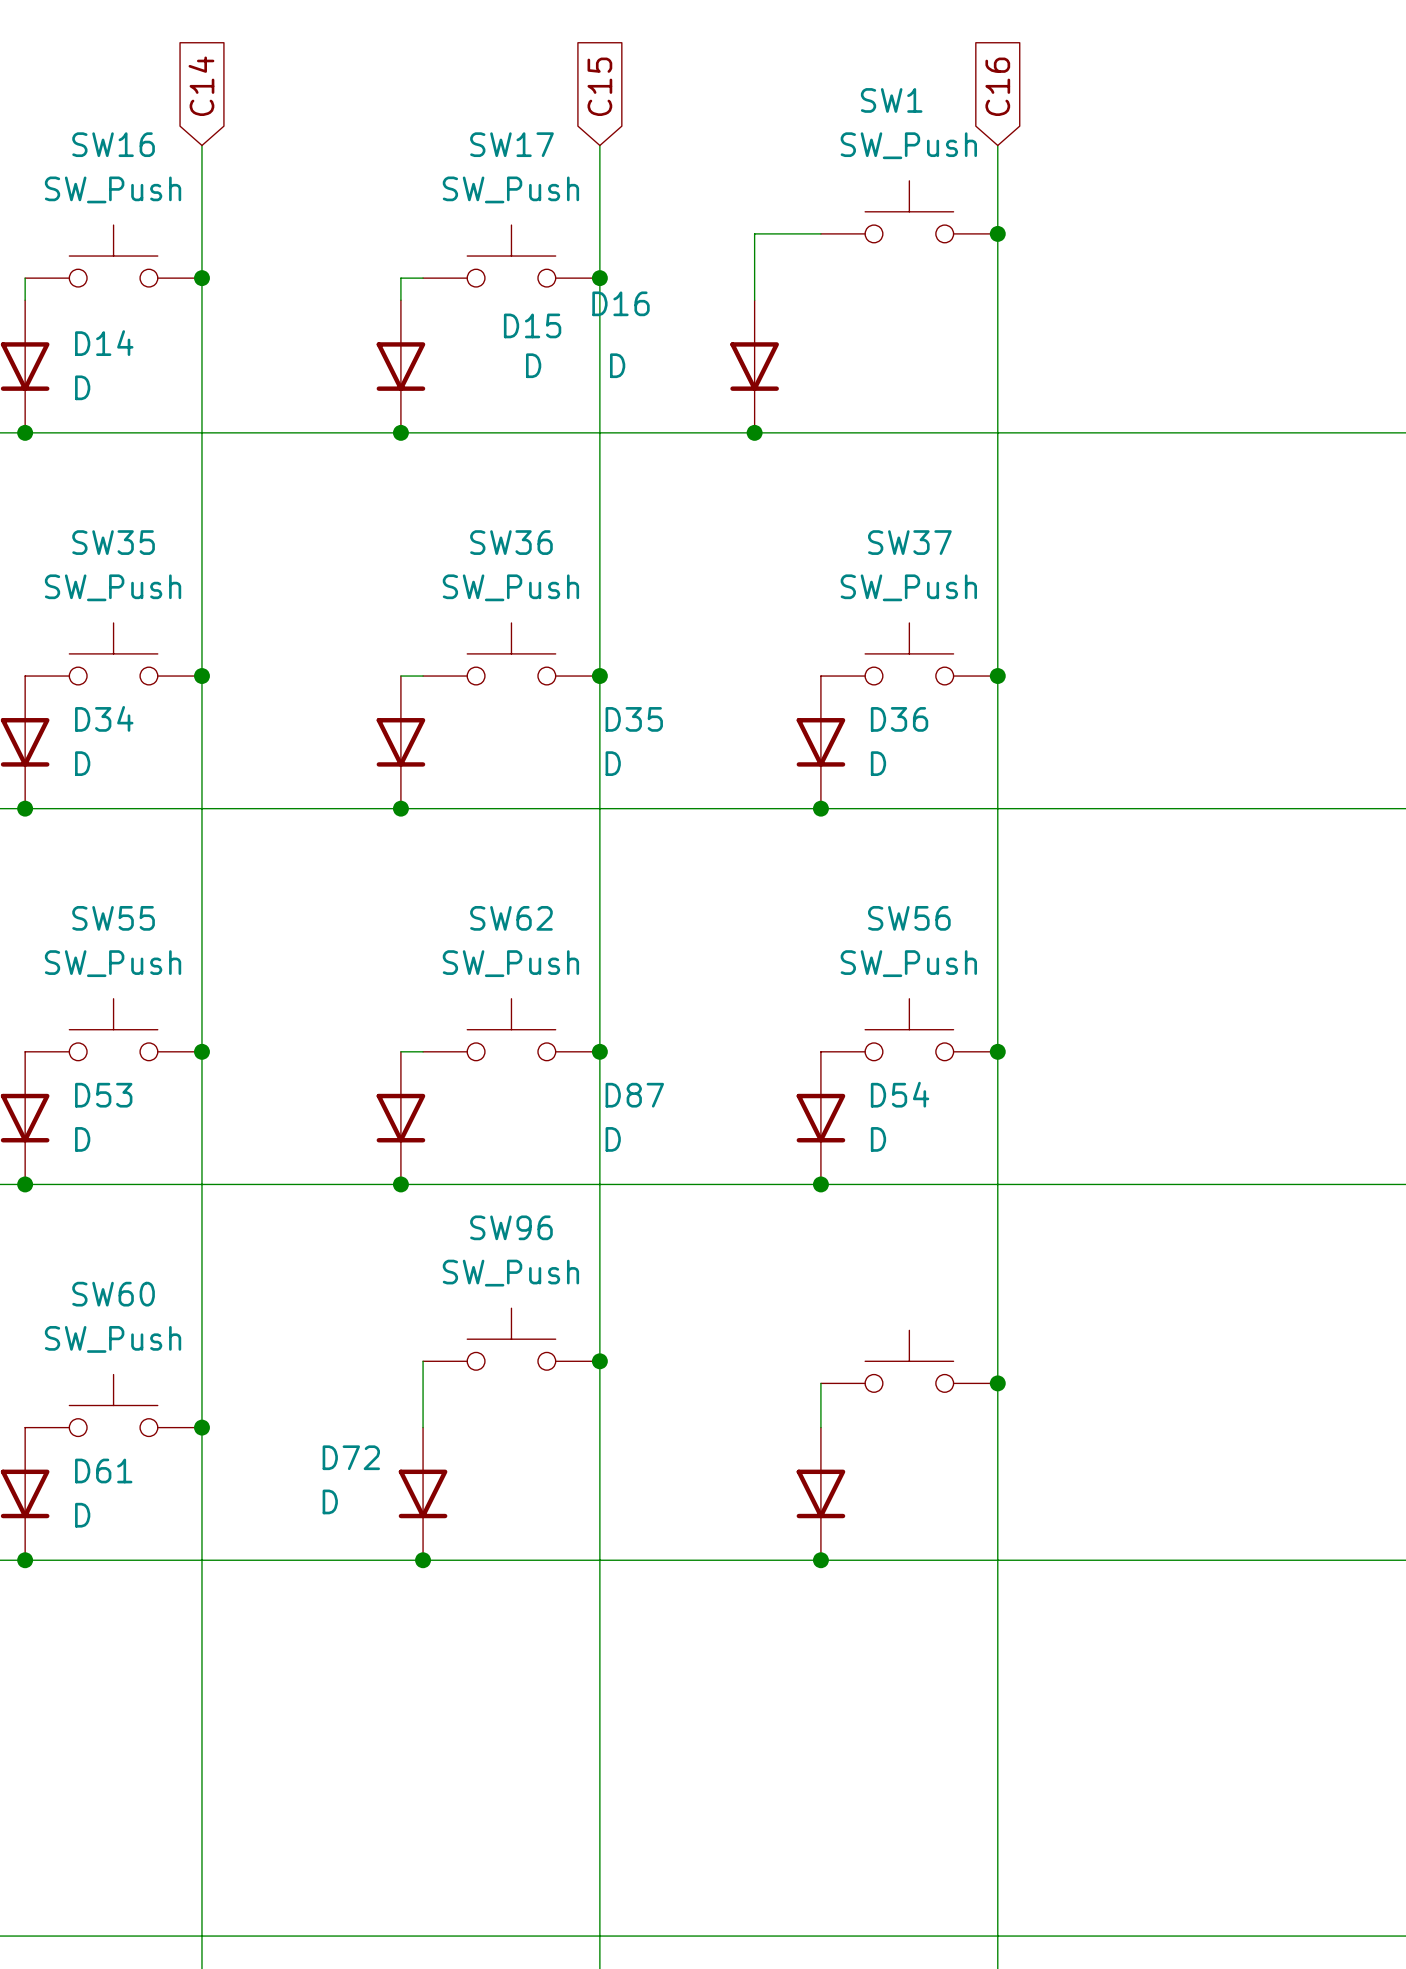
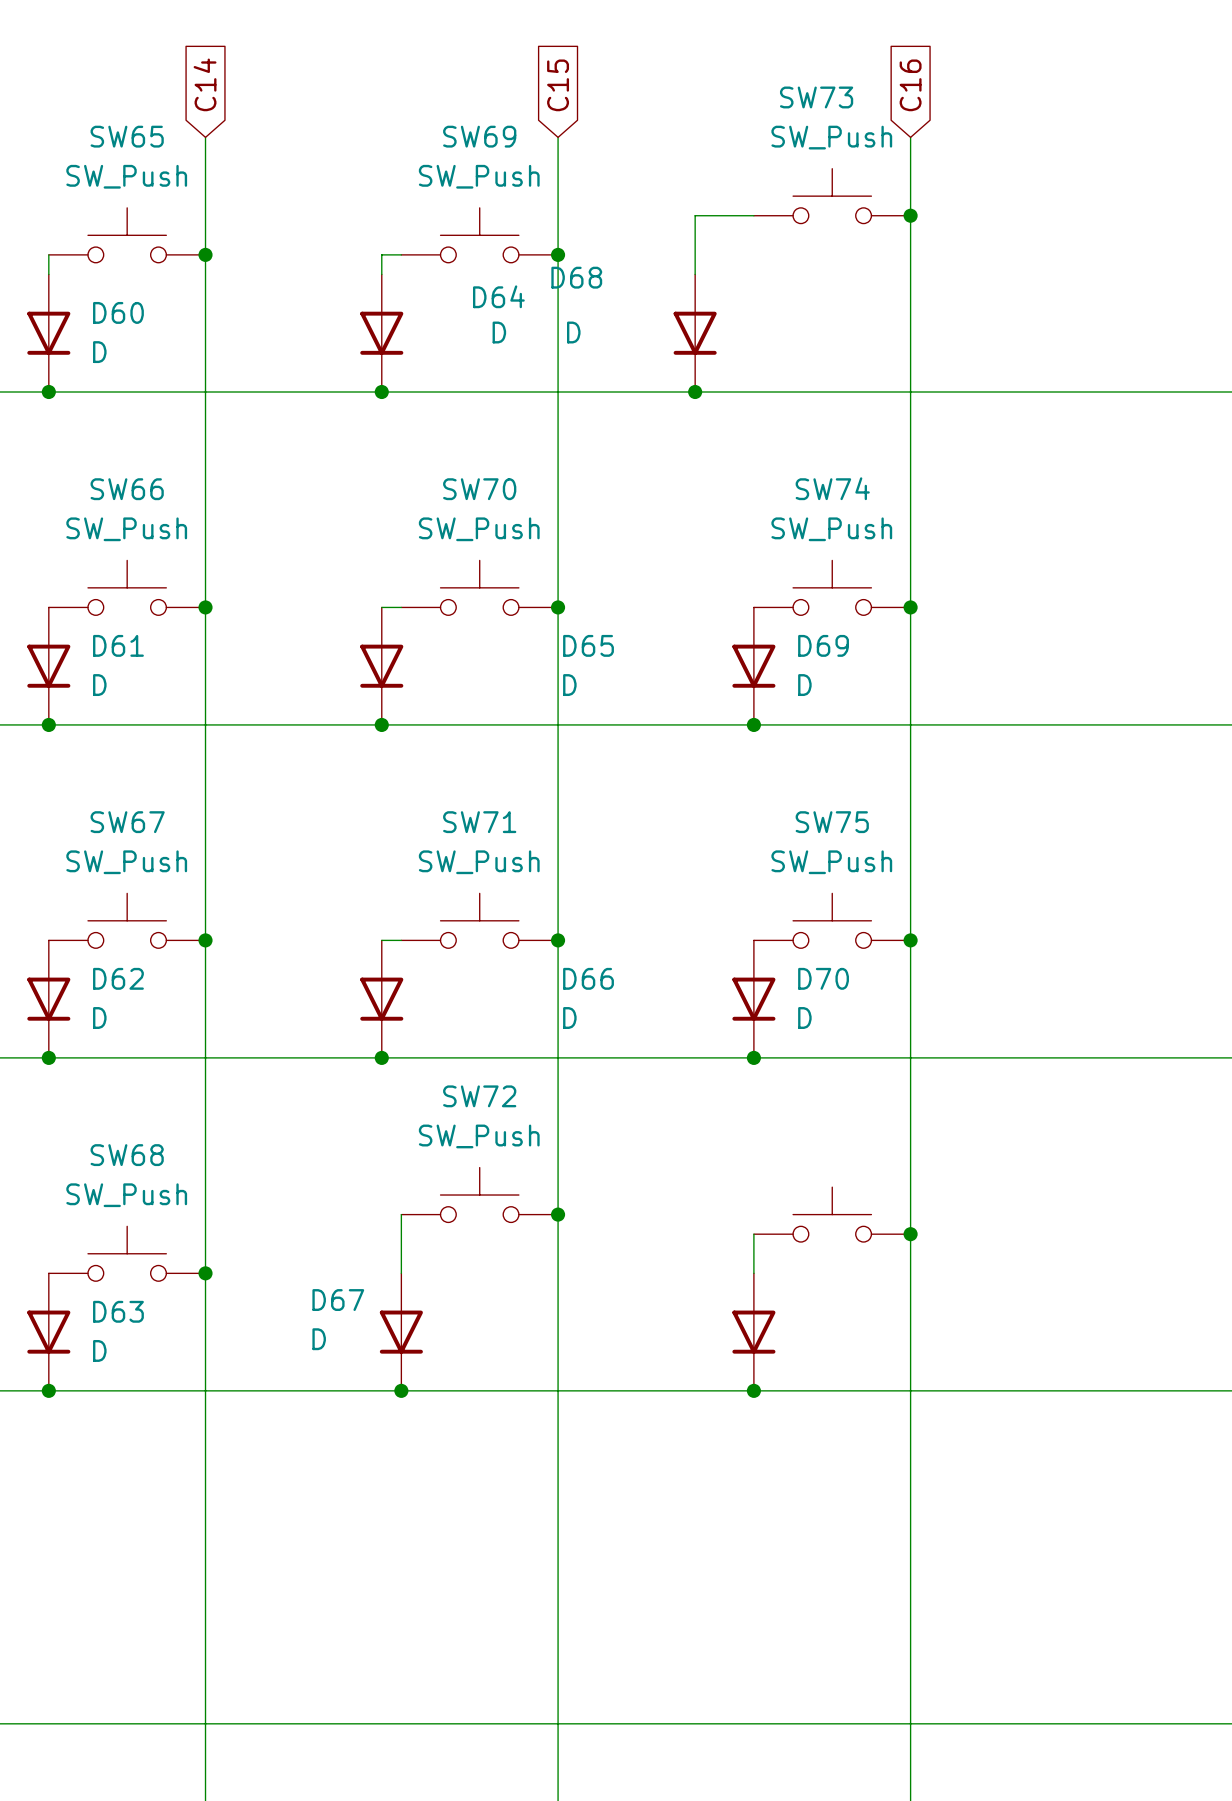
SW1 name: SW1 (891, 100) -> SW73 (816, 97)
SW16 name: SW16 (113, 144) -> SW65 (127, 136)
SW17 name: SW17 (511, 144) -> SW69 (479, 136)
D16 name: D16 (621, 303) -> D68 (576, 277)
D15 name: D15 (532, 325) -> D64 (498, 296)
D14 name: D14 (104, 343) -> D60 (118, 312)
SW35 name: SW35 (113, 542) -> SW66 (127, 489)
SW36 name: SW36 (511, 542) -> SW70 (479, 489)
SW37 name: SW37 (909, 542) -> SW74 (832, 488)
D34 name: D34 (104, 718) -> D61 (118, 645)
D35 name: D35 (634, 719) -> D65 (588, 645)
D36 name: D36 (899, 719) -> D69 (823, 645)
SW55 name: SW55 (113, 918) -> SW67 (127, 822)
SW62 name: SW62 (511, 918) -> SW71 (479, 822)
SW56 name: SW56 (909, 918) -> SW75 (832, 822)
D54 name: D54 (900, 1094) -> D70 (823, 978)
D53 name: D53 (103, 1095) -> D62 (118, 978)
D87 name: D87 (634, 1095) -> D66 (588, 978)
SW96 name: SW96 (511, 1227) -> SW72 (479, 1096)
SW60 name: SW60 (113, 1294) -> SW68 (127, 1155)
D72 name: D72 (351, 1457) -> D67 (338, 1300)
D61 name: D61 (103, 1470) -> D63 (118, 1311)

